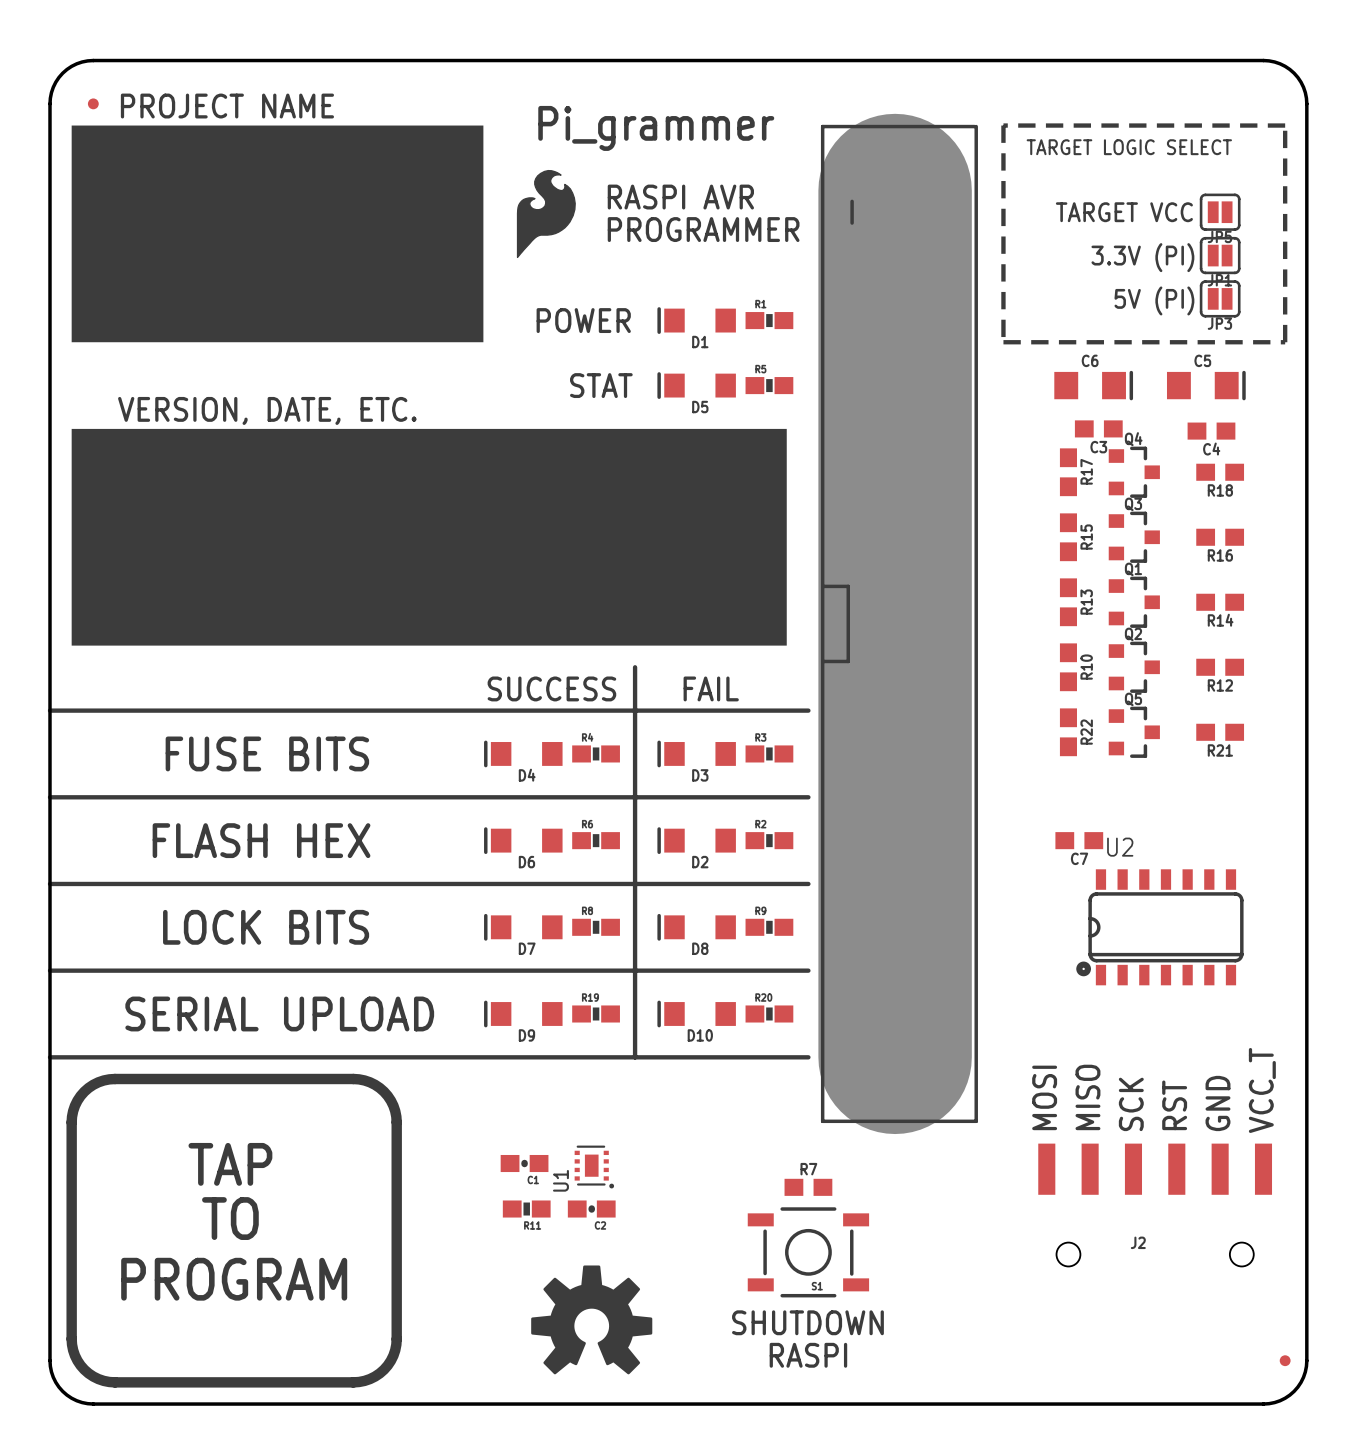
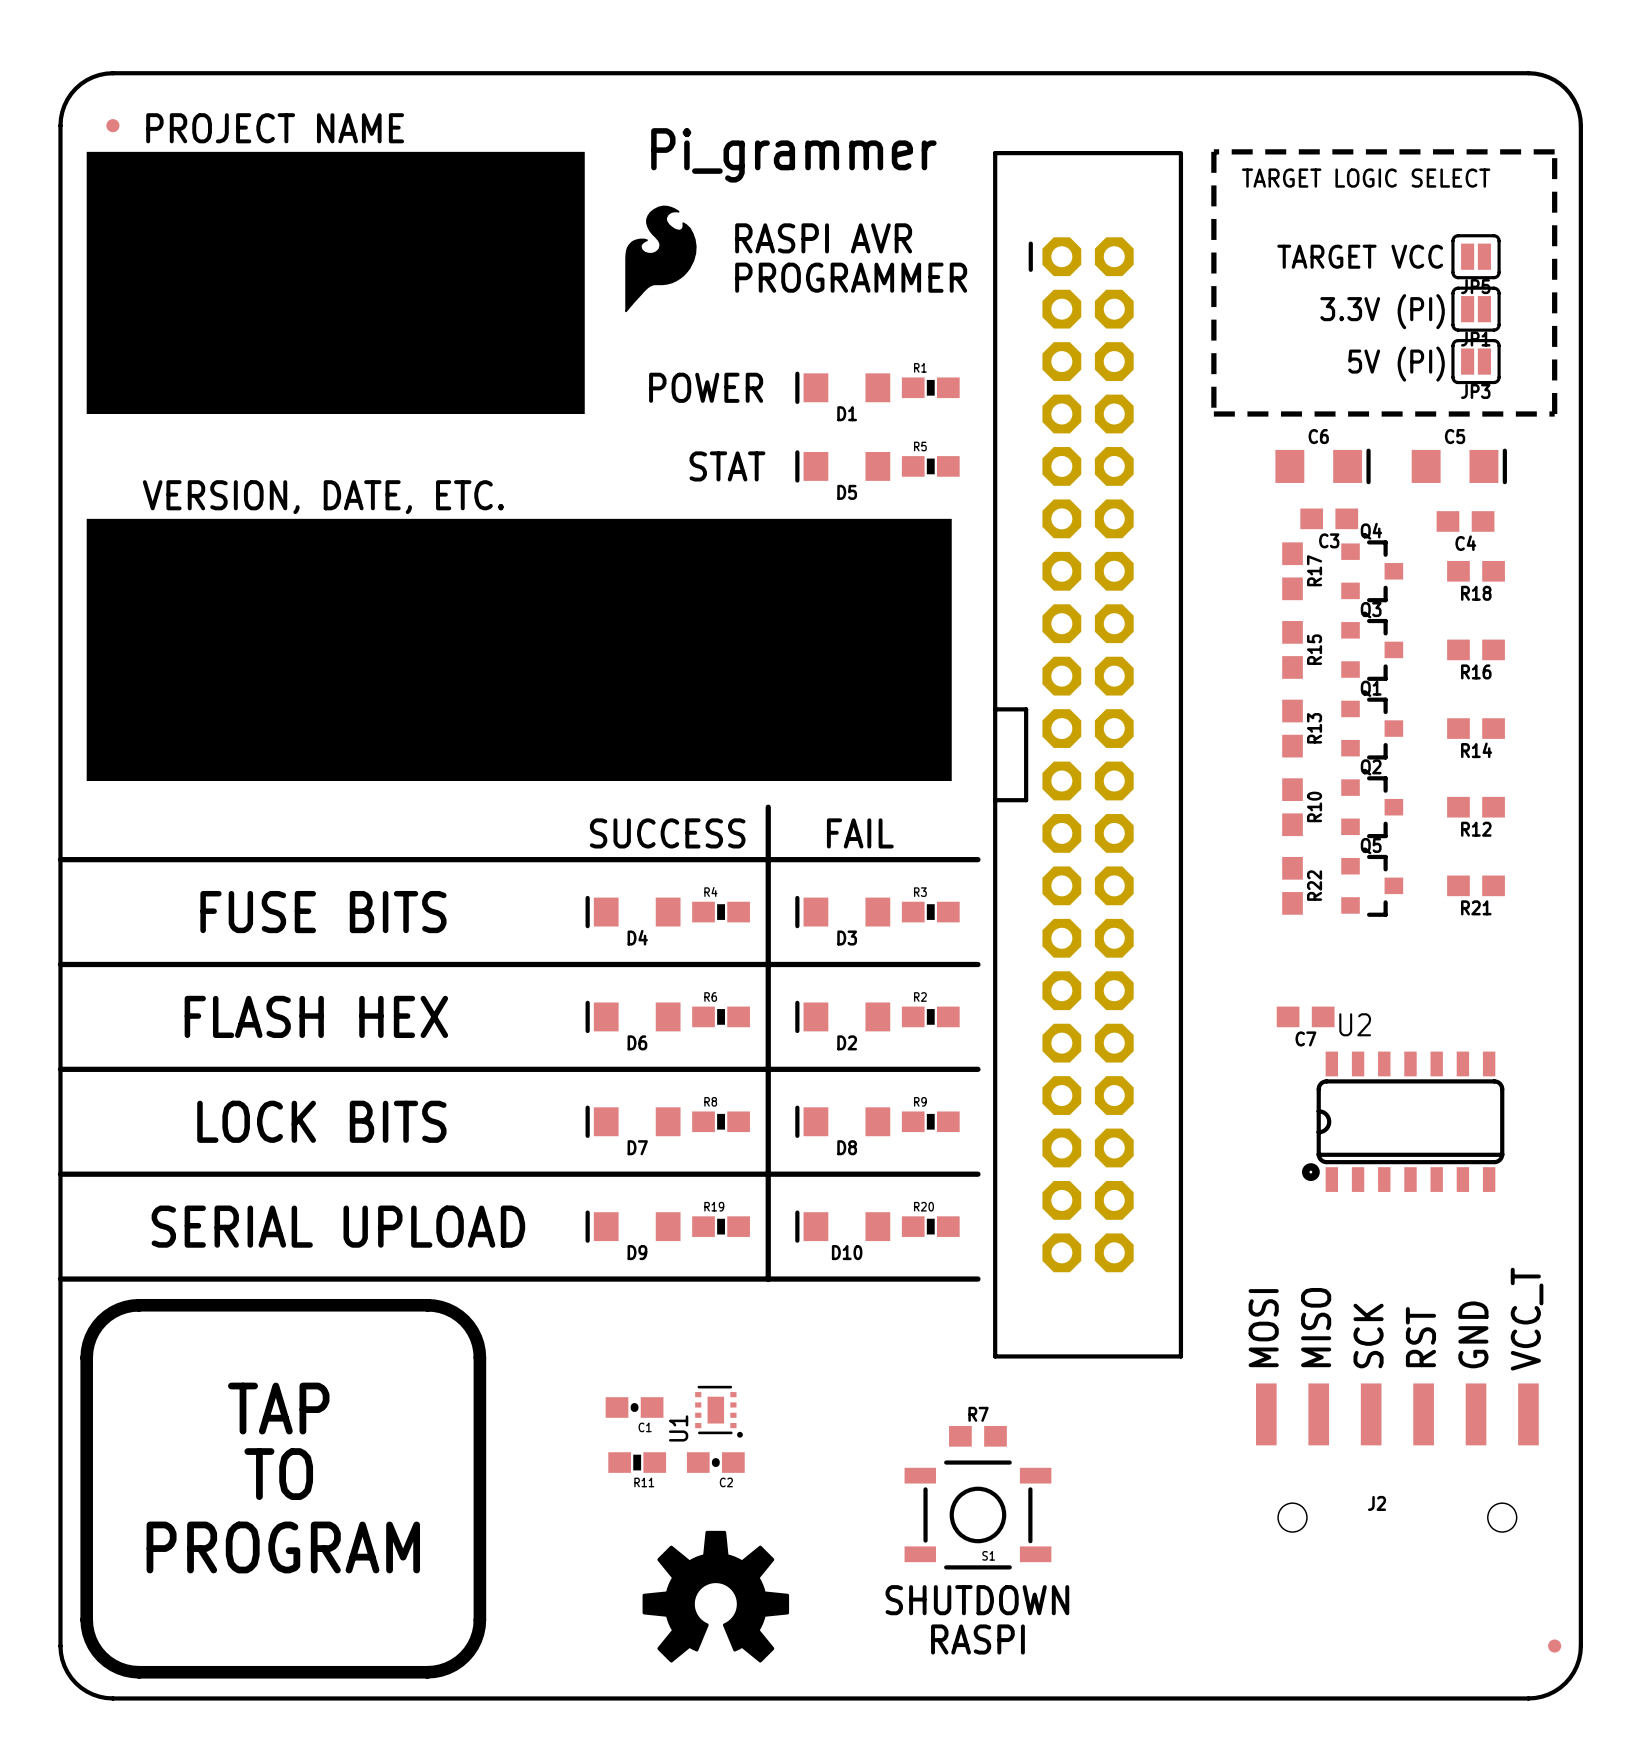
line: (895, 190) (895, 1057) -> none

